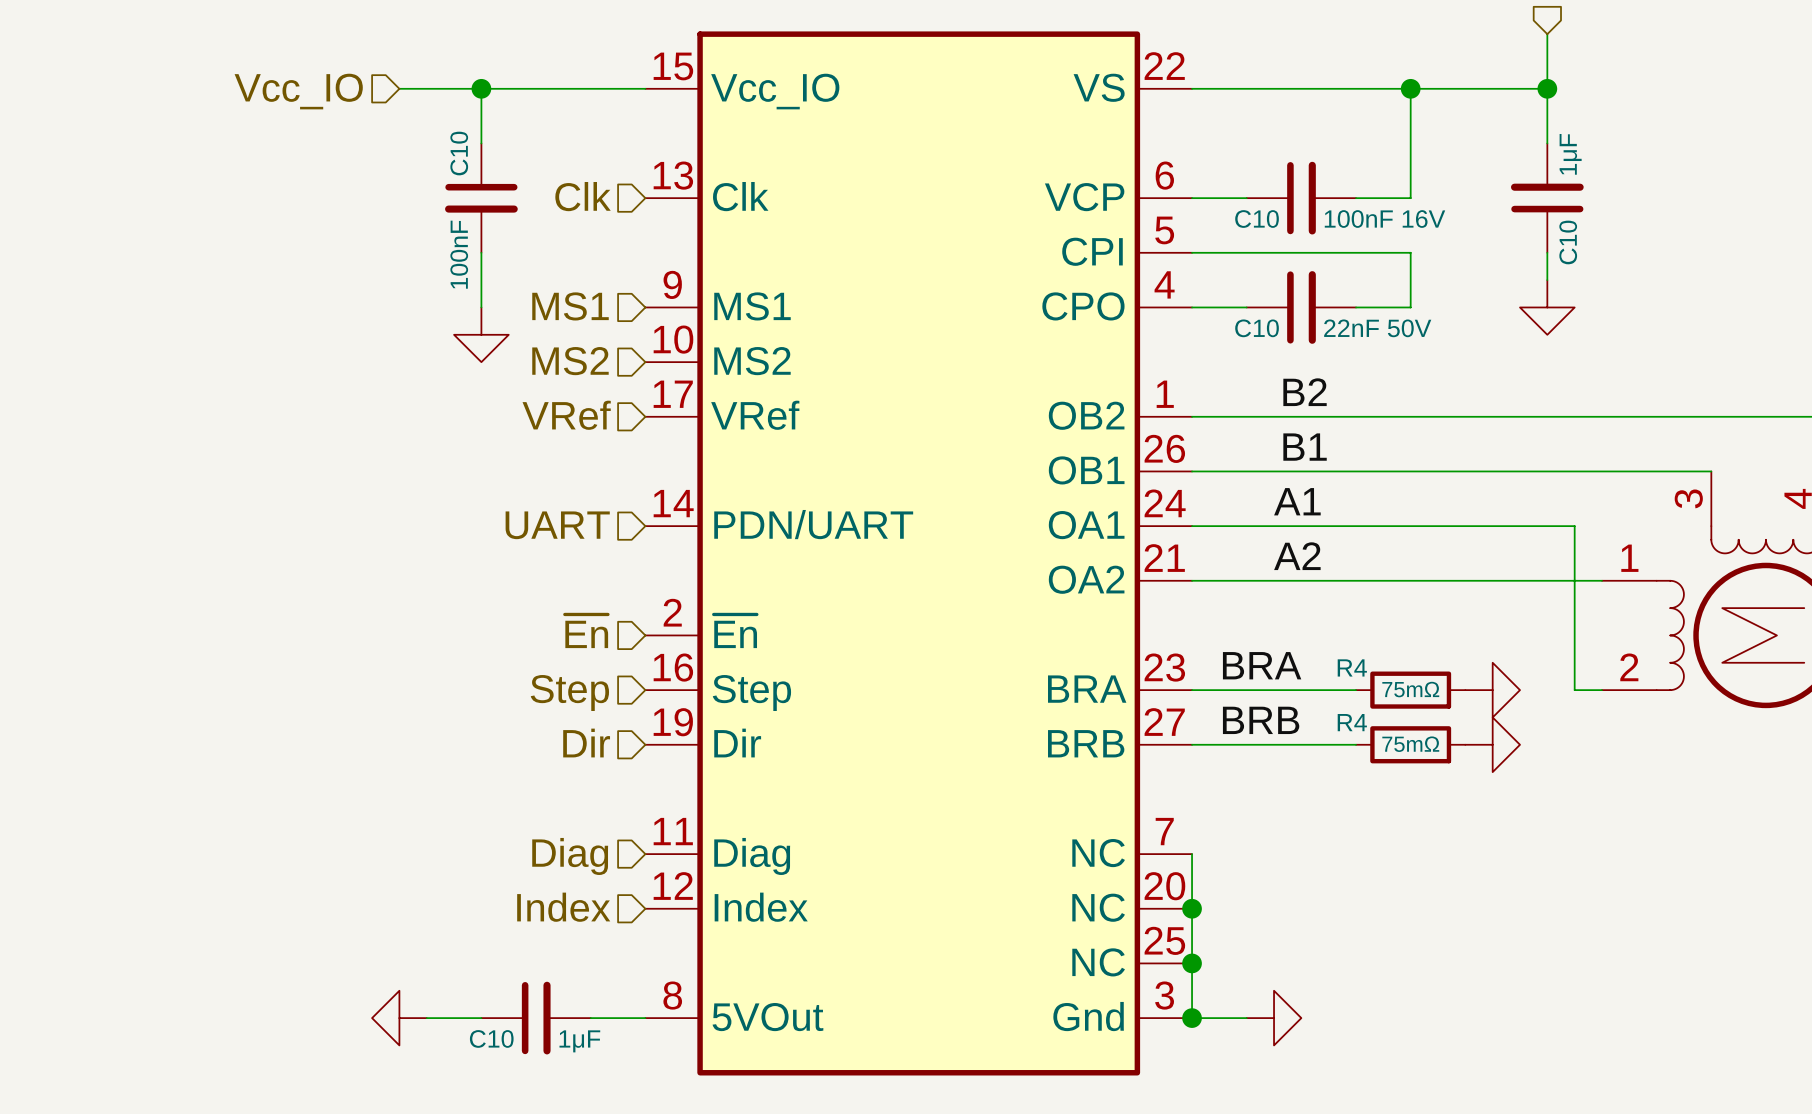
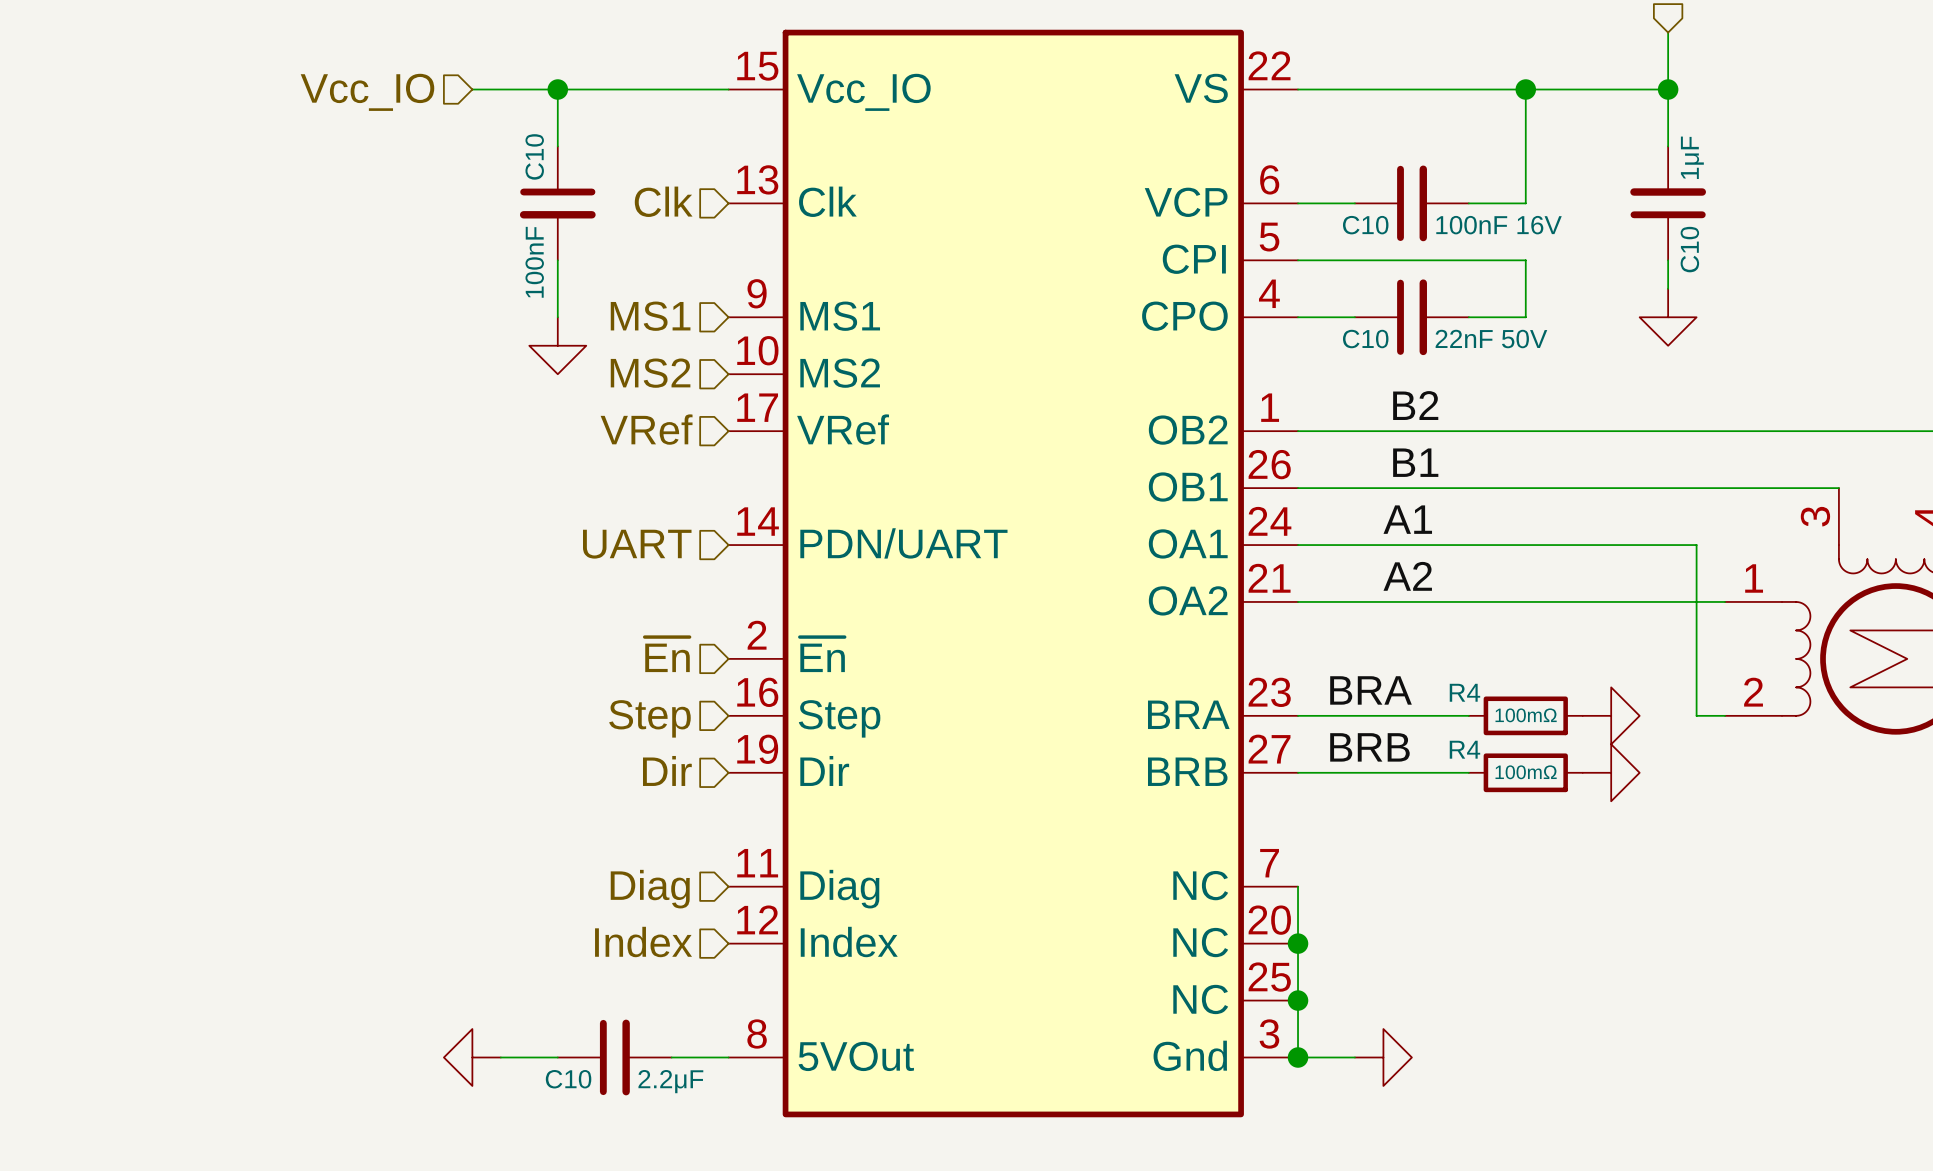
R4 value: 75mΩ (1410, 689) -> 100mΩ (1526, 715)
R4 value: 75mΩ (1410, 744) -> 100mΩ (1526, 772)
C10 value: 1μF (579, 1041) -> 2.2μF (670, 1081)

